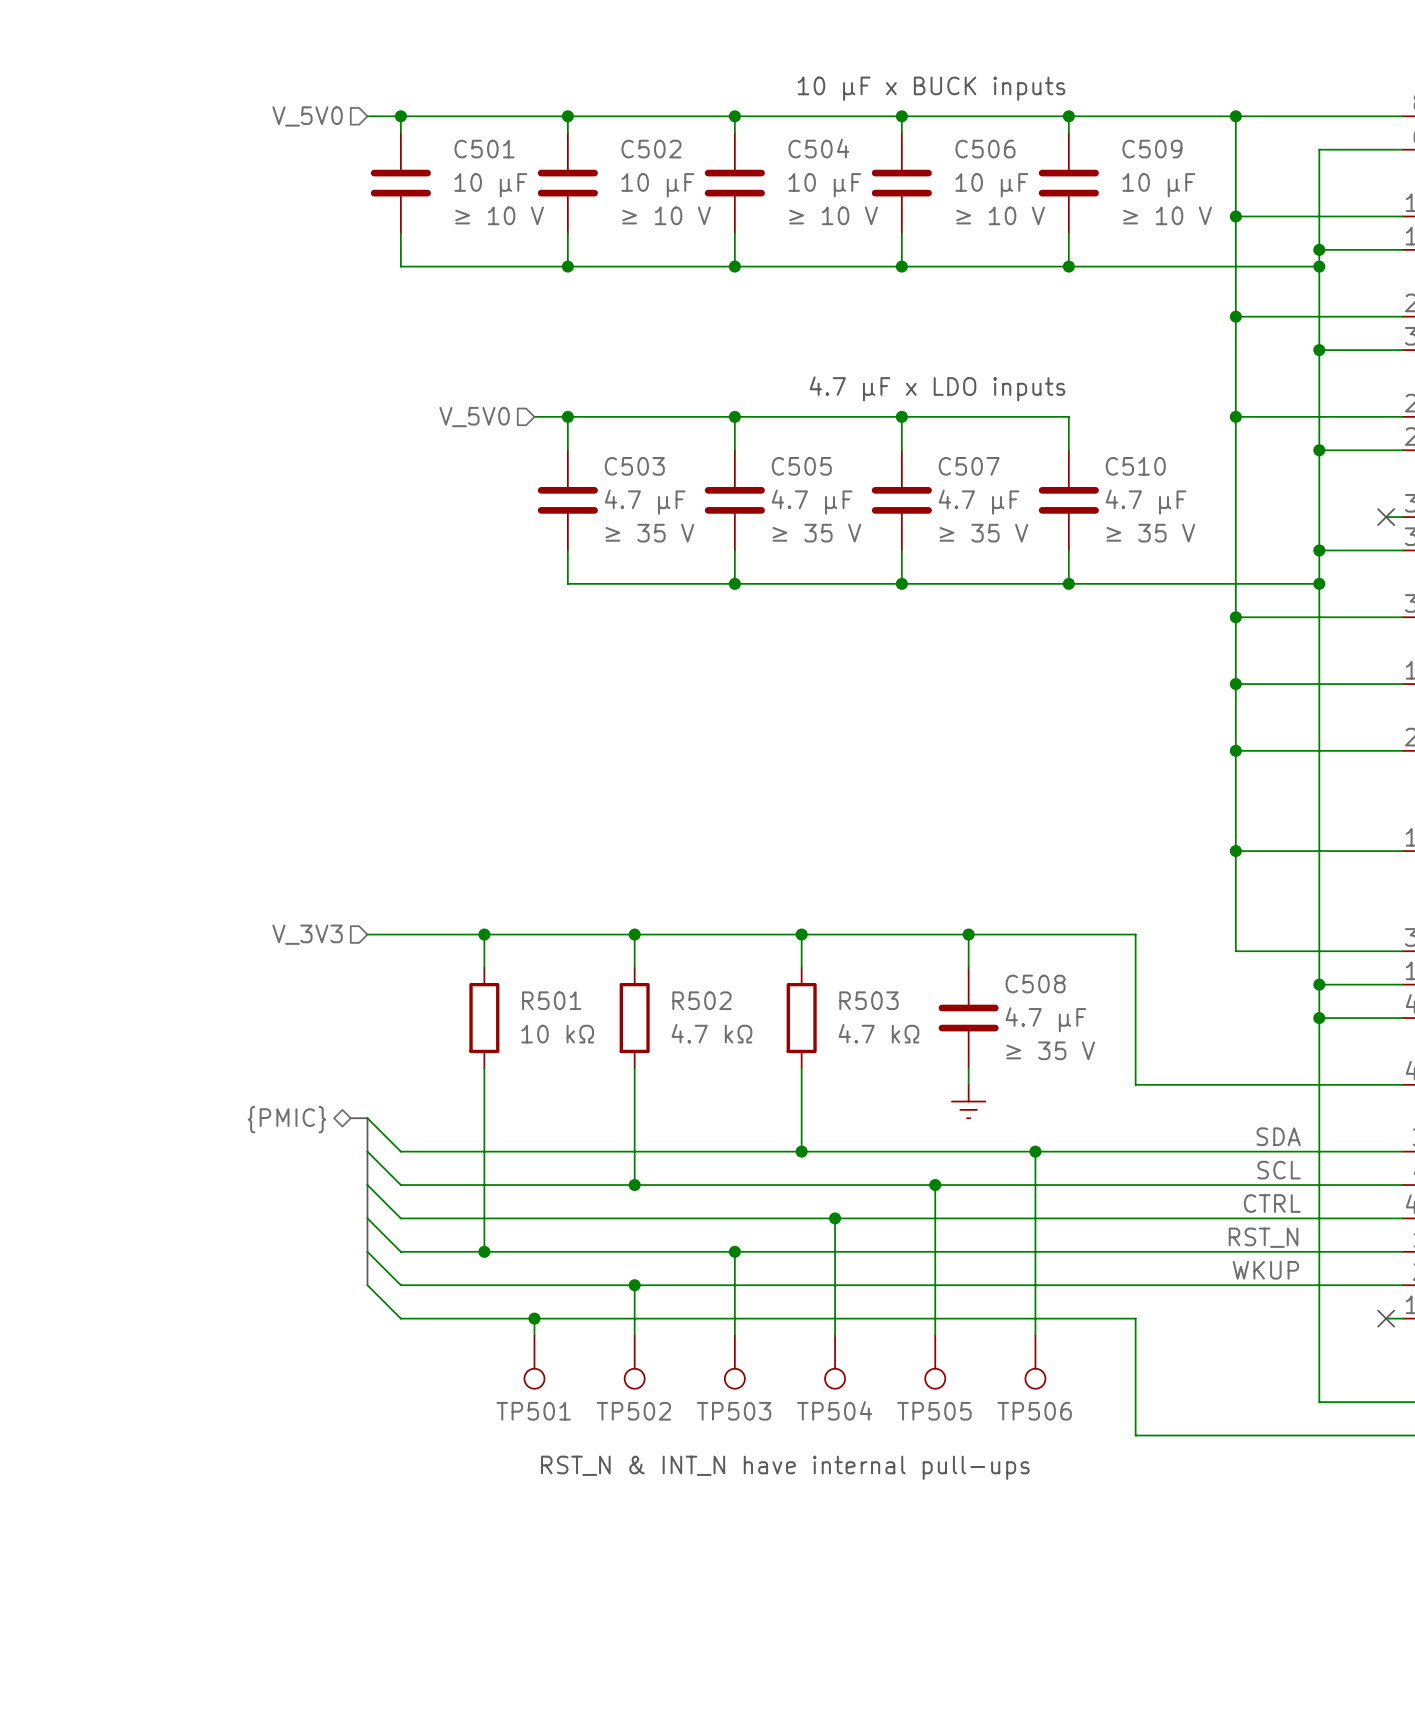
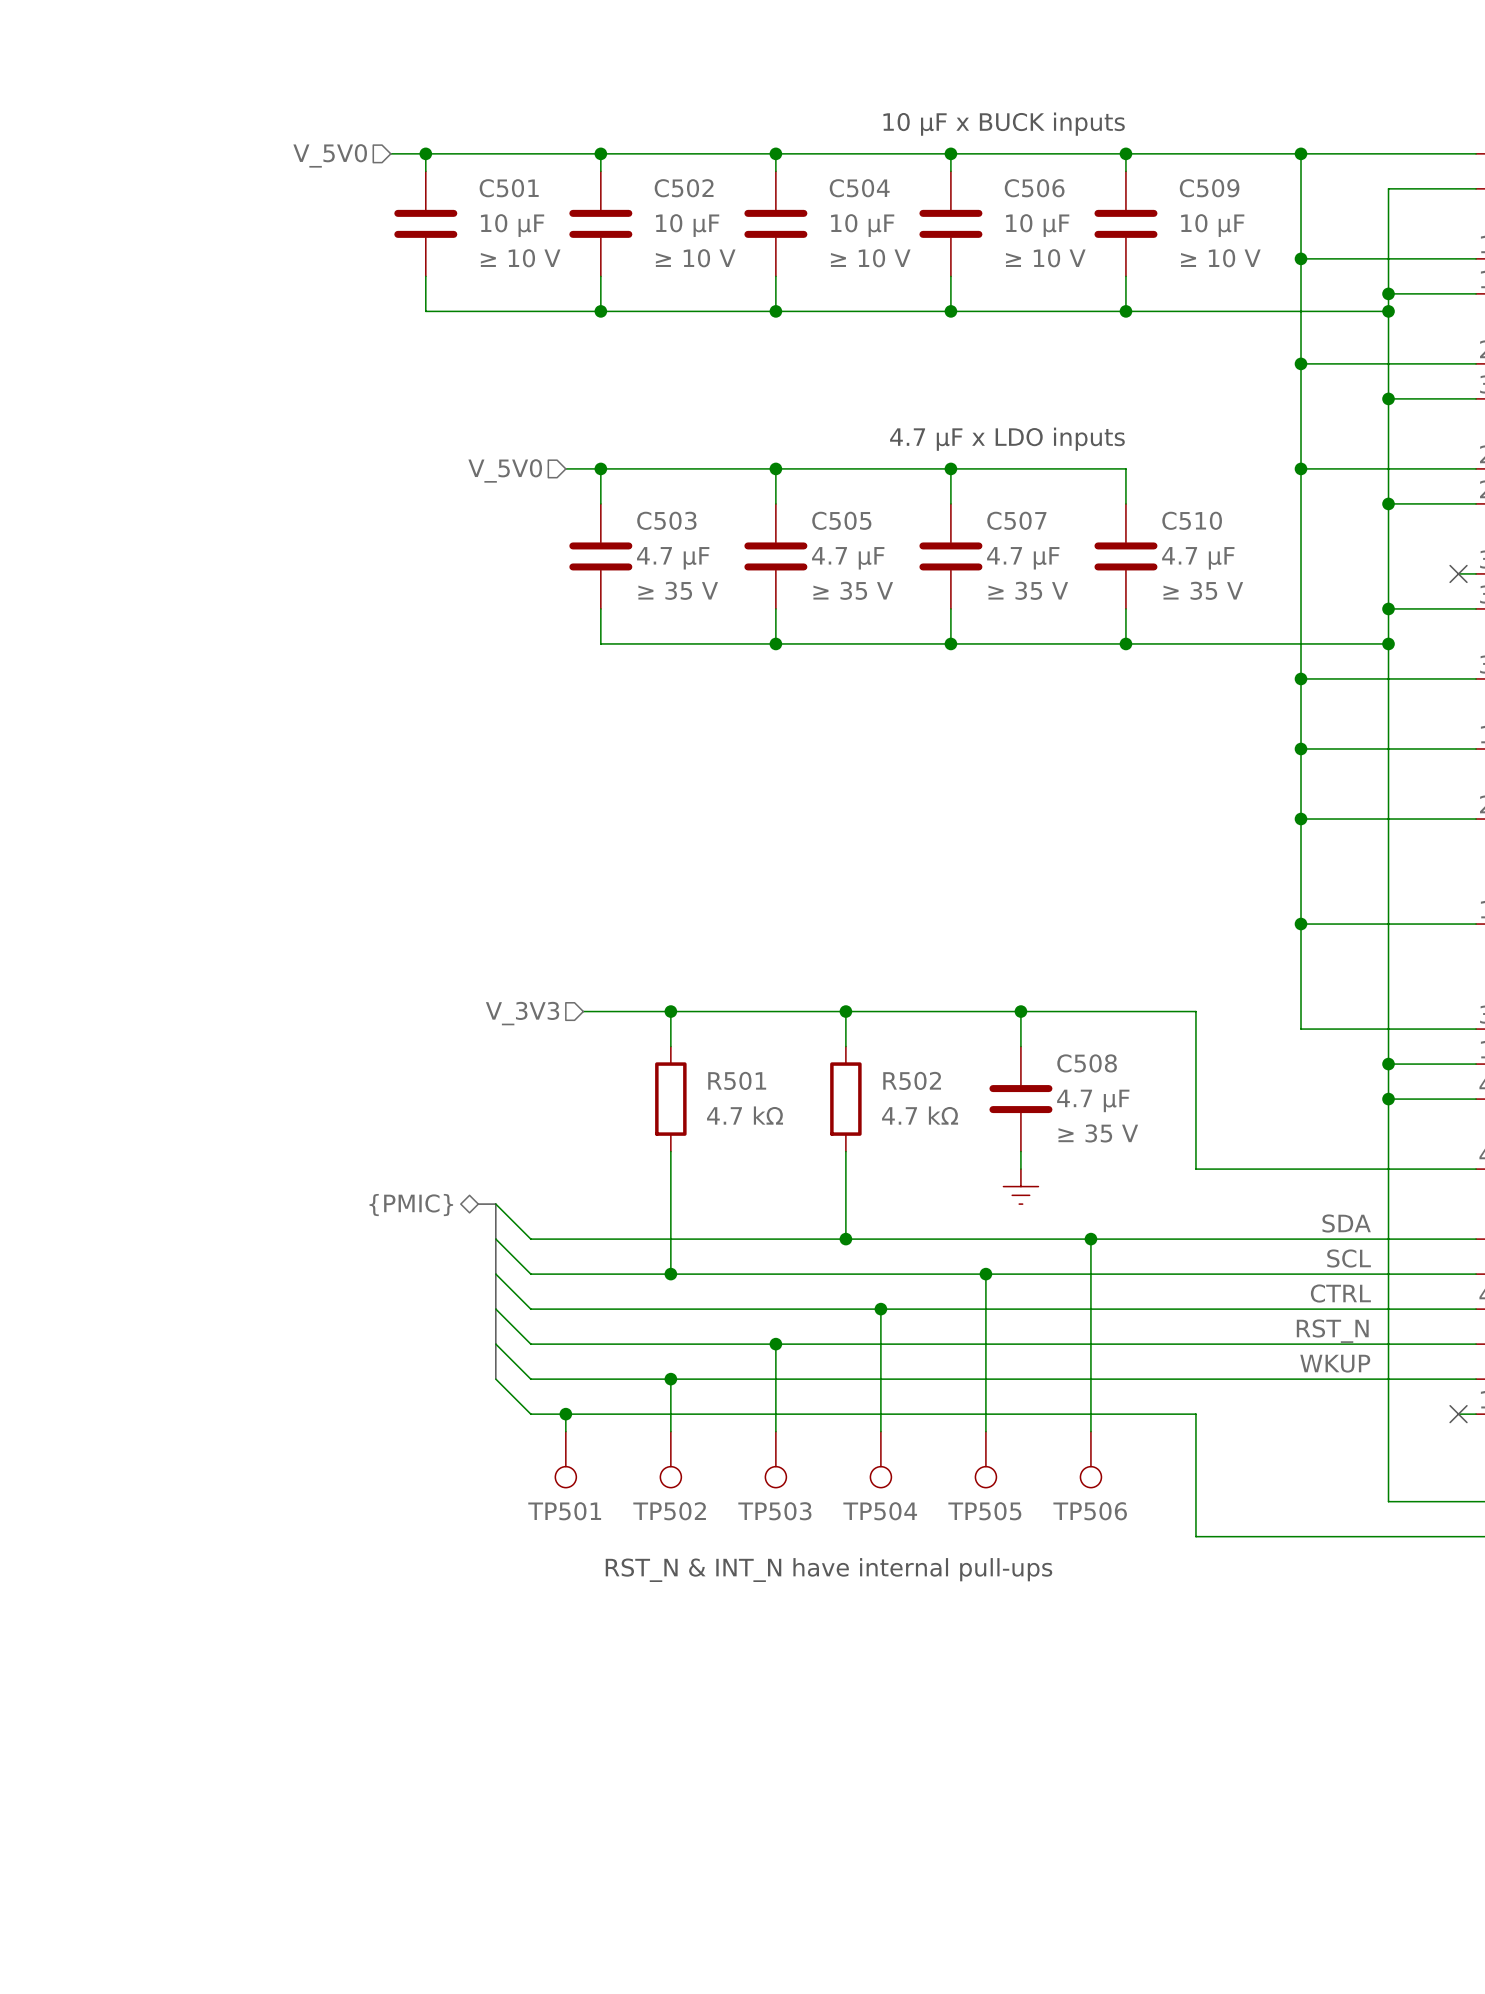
hierarchical label position: V_3V3 (307, 934) -> V_3V3 (522, 1013)
wire: (367, 934) (551, 934) -> none
wire: (484, 934) (484, 967) -> none
junction: (484, 934) -> none
R502 name: R502 (701, 1000) -> R501 (737, 1080)
R503 name: R503 (868, 1000) -> R502 (912, 1080)
R501: 10 kΩ (484, 1018) -> none
wire: (484, 1068) (484, 1251) -> none
bus: (350, 1118) (367, 1118) (367, 1285) -> (478, 1204) (495, 1204) (495, 1379)
wire: (367, 1118) (400, 1151) (501, 1151) -> (495, 1204) (530, 1239)
hierarchical label position: {PMIC} (286, 1119) -> {PMIC} (411, 1205)
wire: (367, 1151) (400, 1185) (501, 1185) -> (495, 1239) (530, 1274)
wire: (367, 1185) (400, 1218) (501, 1218) -> (495, 1274) (530, 1309)
wire: (367, 1218) (400, 1251) (501, 1251) -> (495, 1309) (530, 1344)
wire: (367, 1251) (400, 1285) (501, 1285) -> (495, 1344) (530, 1379)
junction: (484, 1251) -> none
wire: (367, 1285) (400, 1318) (501, 1318) -> (495, 1379) (530, 1414)

